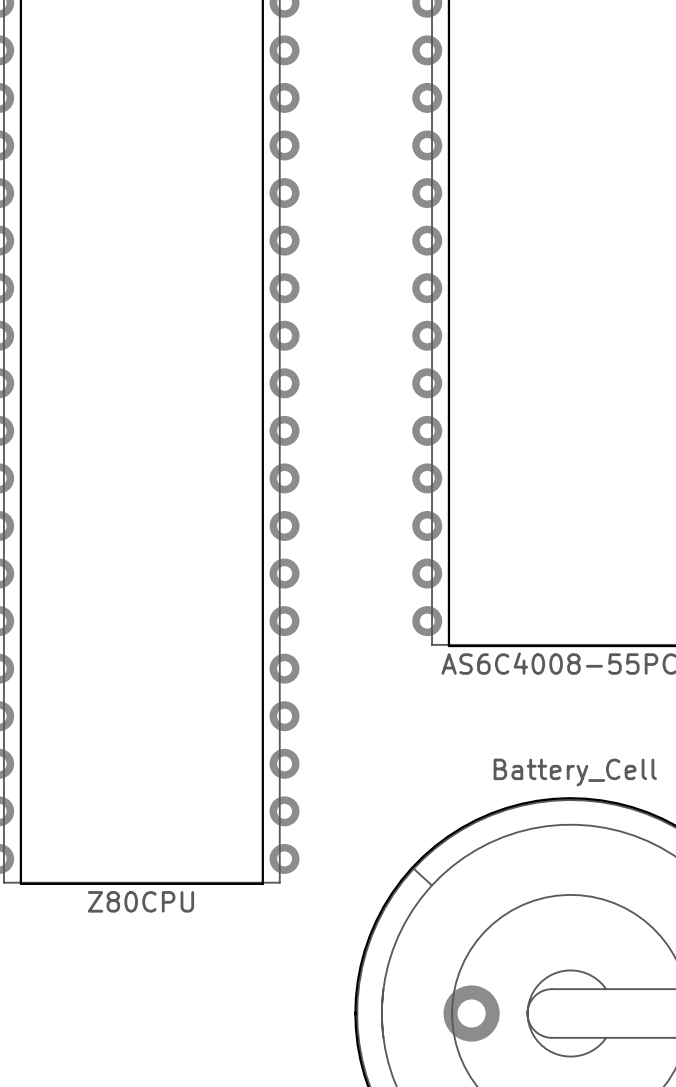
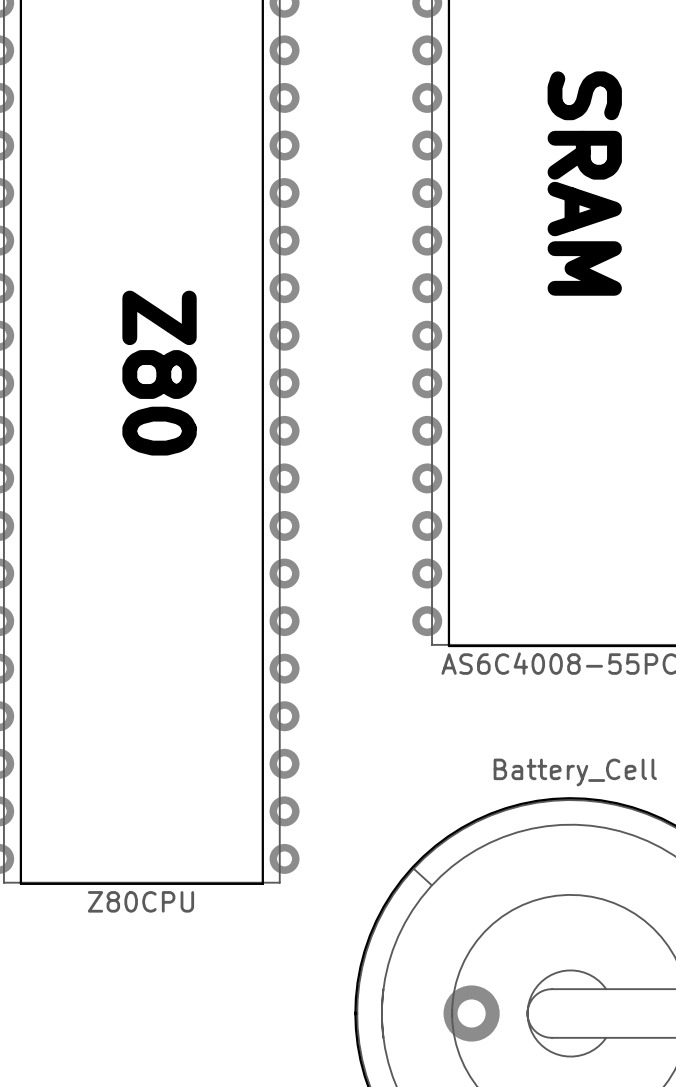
text: none -> SRAM (584, 183)
text: none -> Z80 (159, 373)

